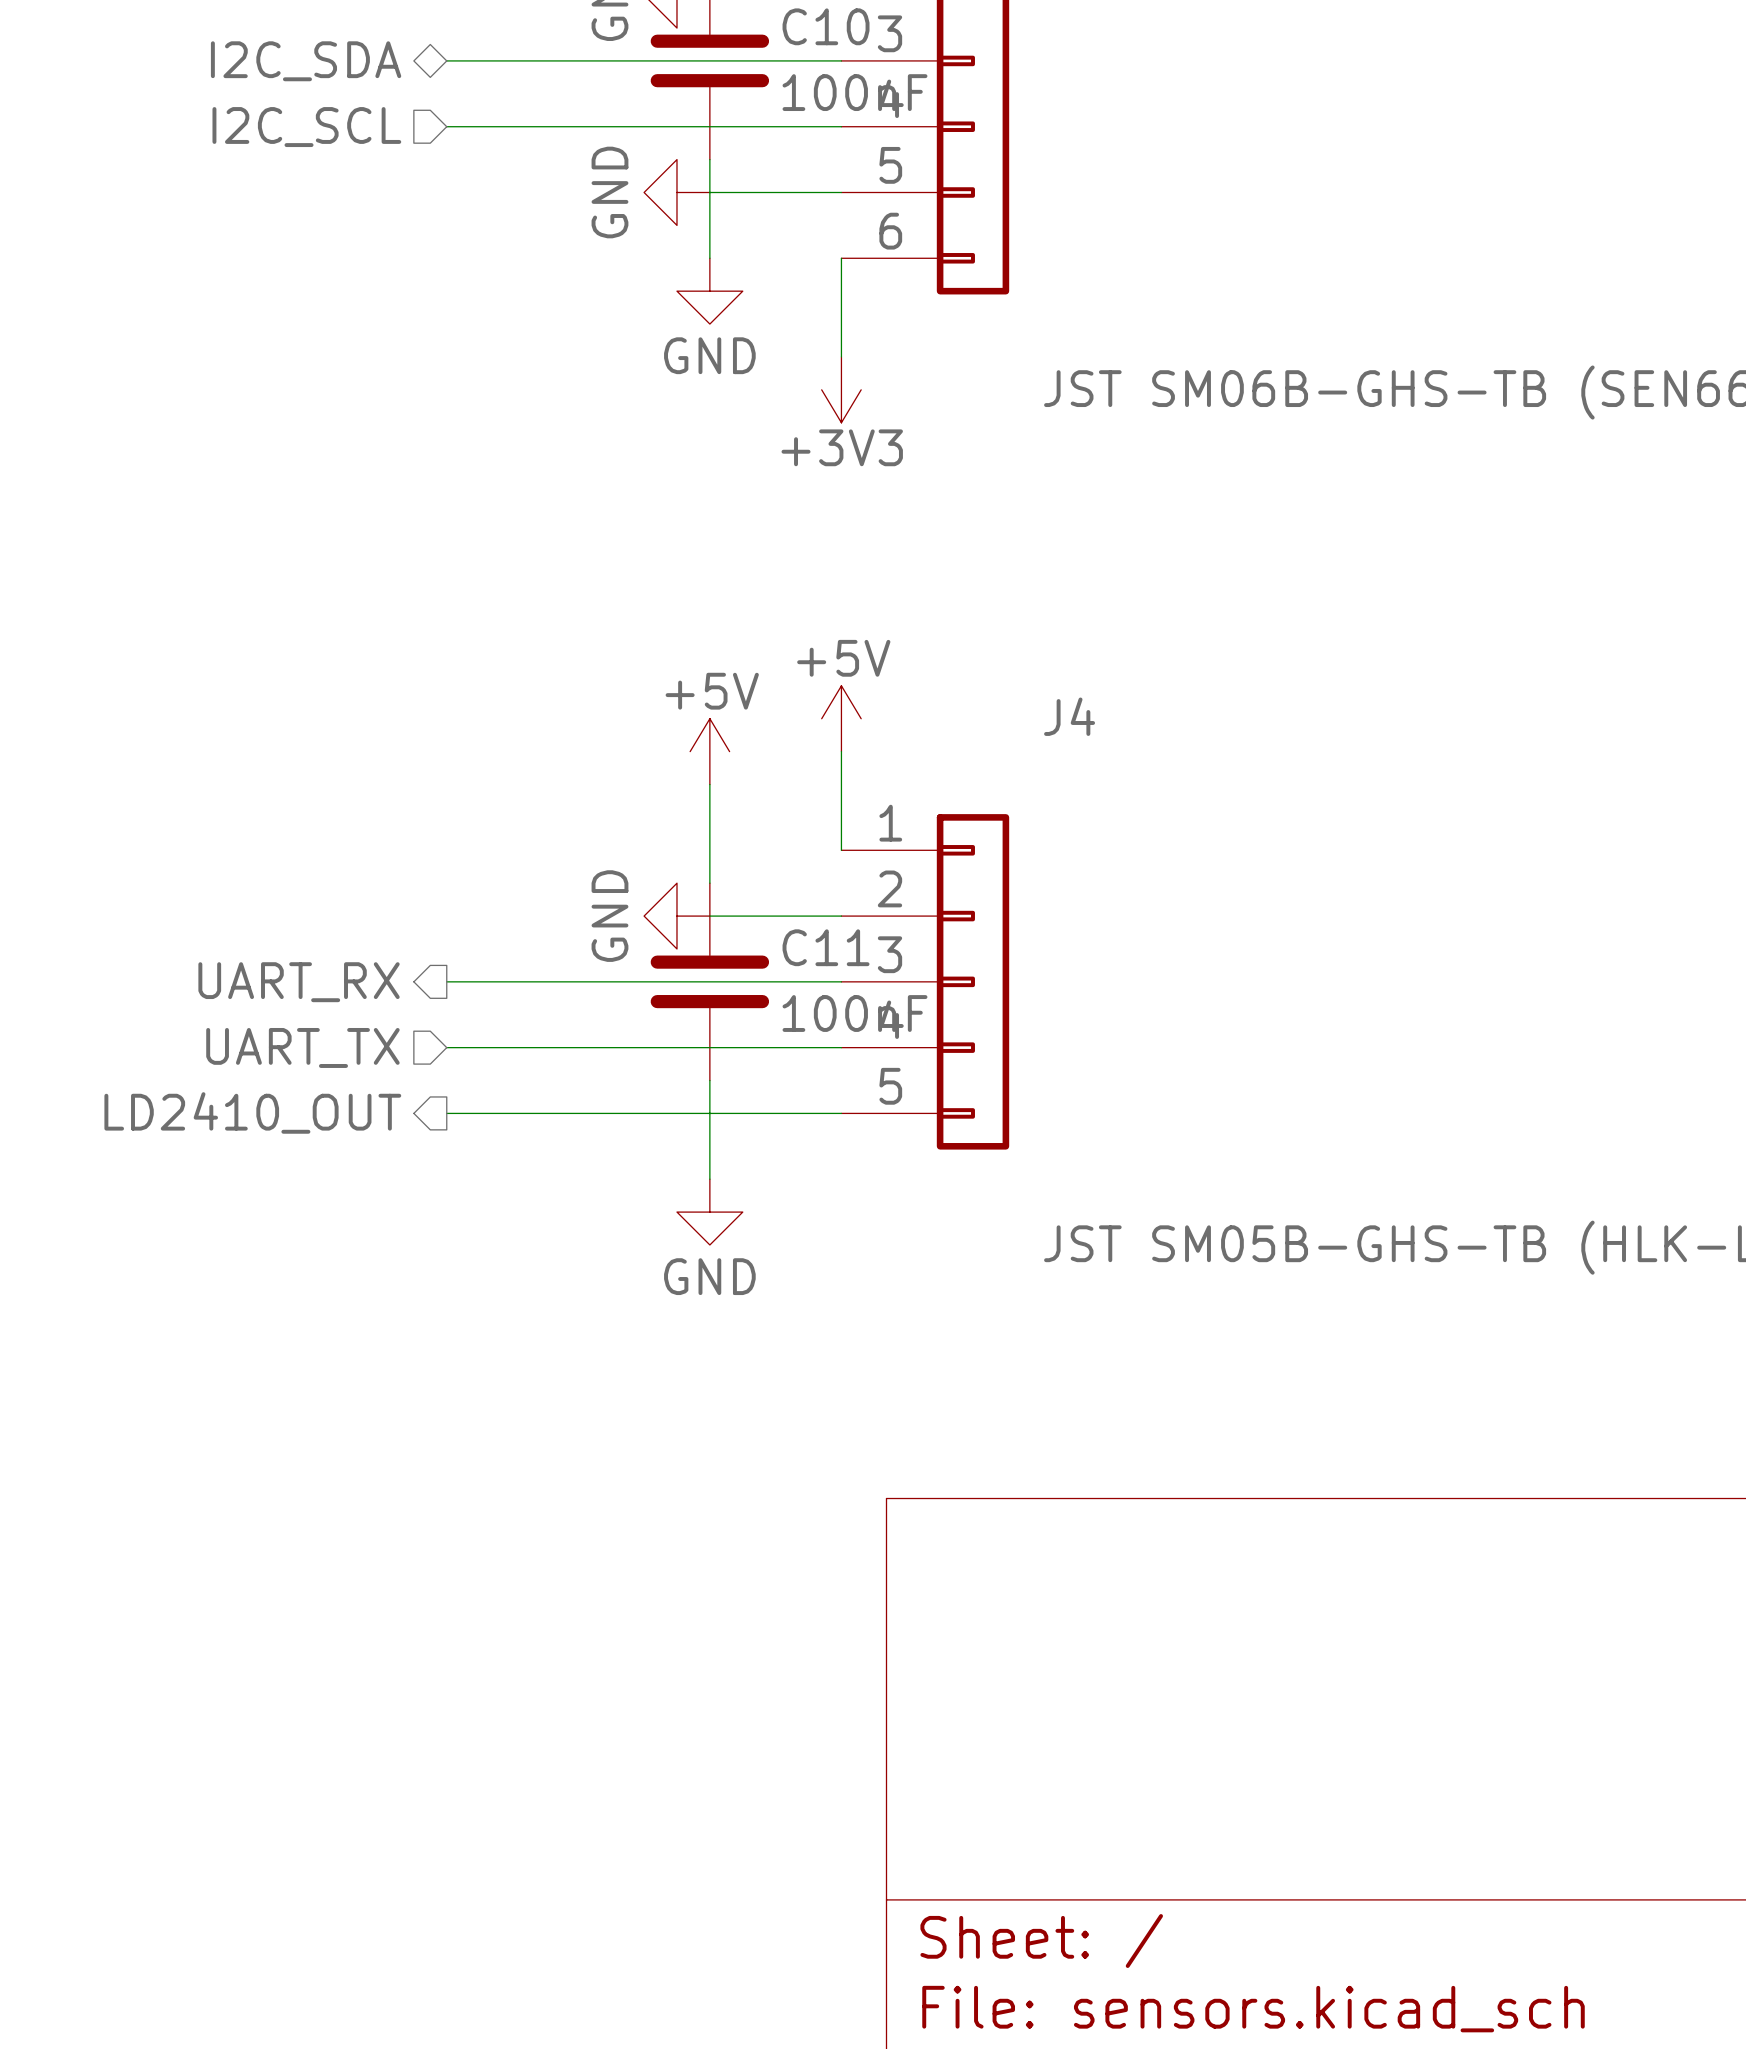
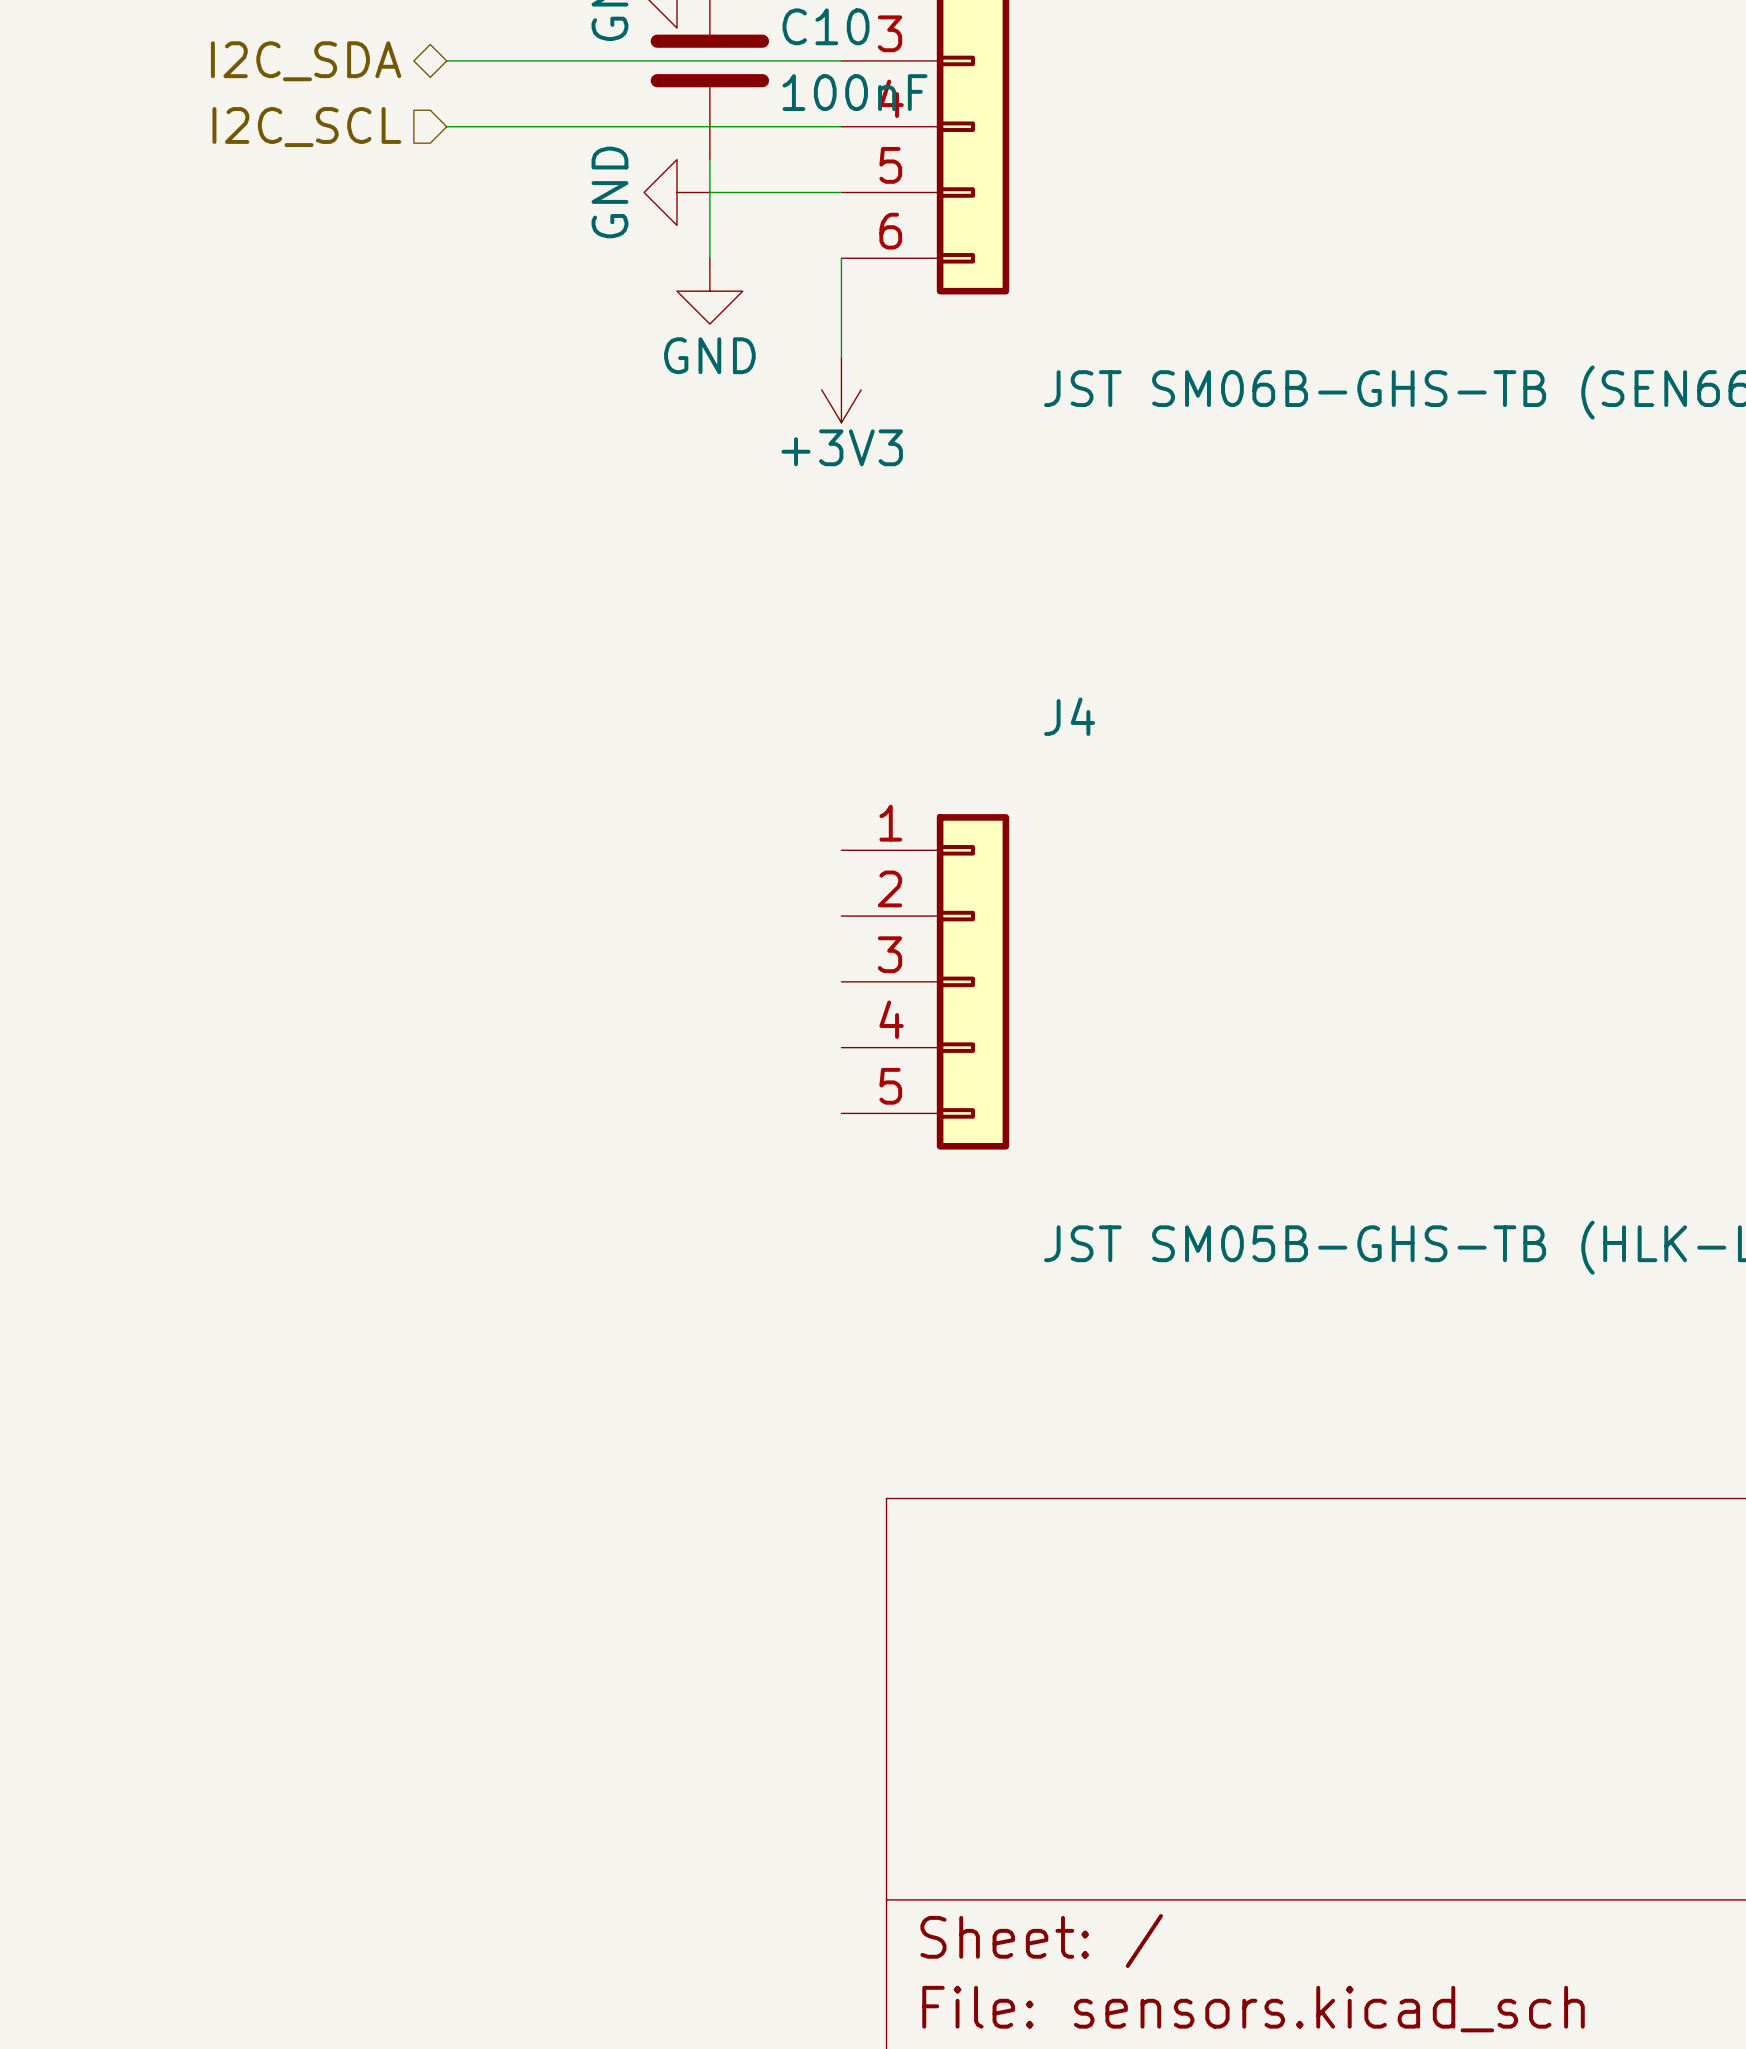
power symbol: +5V (841, 718) -> none
power symbol: +5V (709, 751) -> none
wire: (841, 751) (841, 850) -> none
wire: (709, 784) (709, 883) -> none
power symbol: GND (676, 916) -> none
wire: (709, 916) (841, 916) -> none
wire: (446, 981) (841, 981) -> none
C11: 100nF (709, 981) -> none
hierarchical label: UART_RX (299, 982) -> none
hierarchical label: UART_TX (302, 1047) -> none
wire: (446, 1047) (841, 1047) -> none
wire: (709, 1080) (709, 1179) -> none
hierarchical label: LD2410_OUT (252, 1112) -> none
wire: (446, 1113) (841, 1113) -> none
power symbol: GND (709, 1212) -> none

